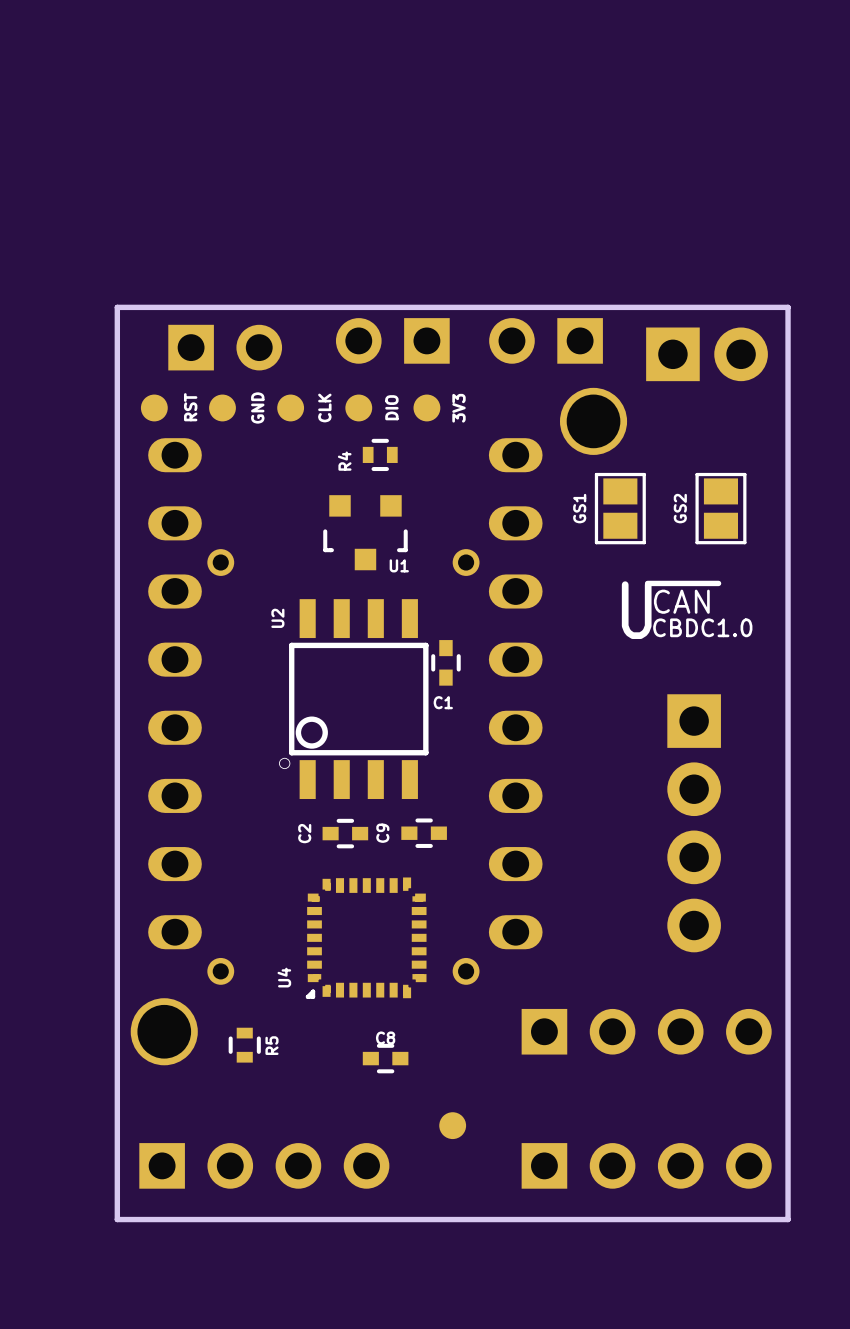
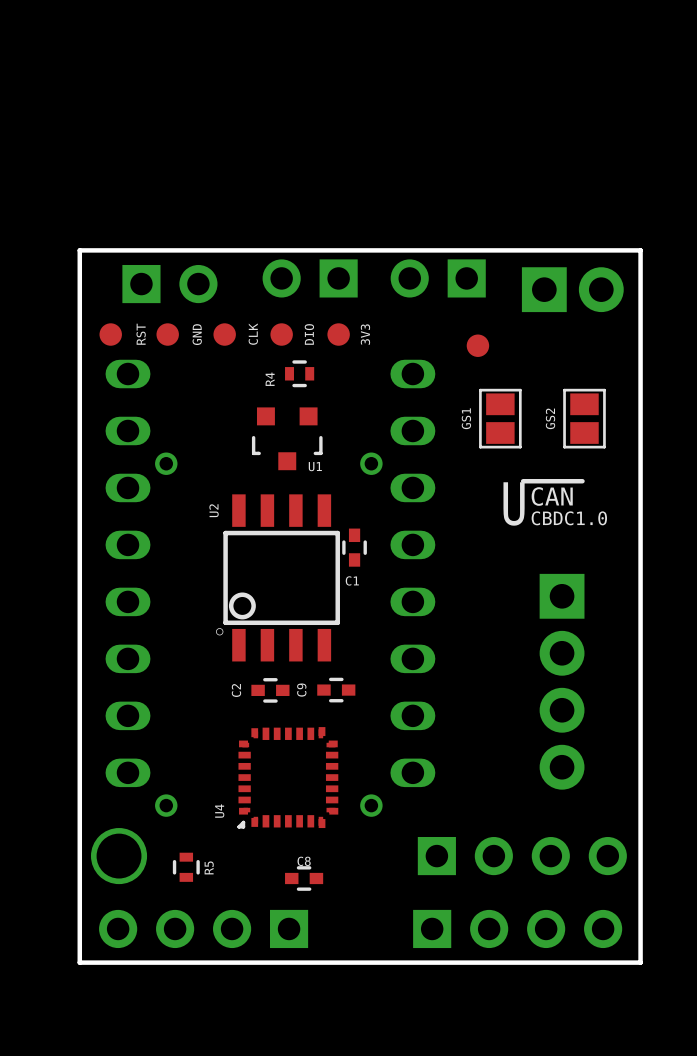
part footprint: [559, 387, 628, 455] -> [466, 334, 490, 357]
part: (452, 1125) -> none
board edge: (117, 1159) (117, 1219) (788, 1219) (788, 1159) -> (79, 962) (640, 962)
part rotation: 0° (264, 1165) -> 180° (203, 928)
part position: (646, 1165) -> (517, 928)

